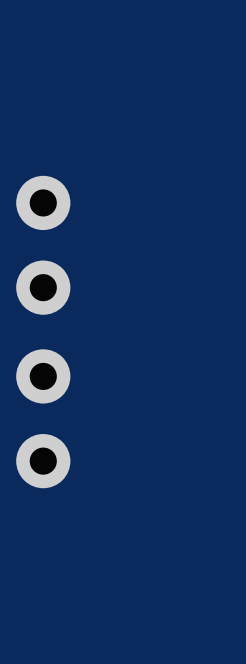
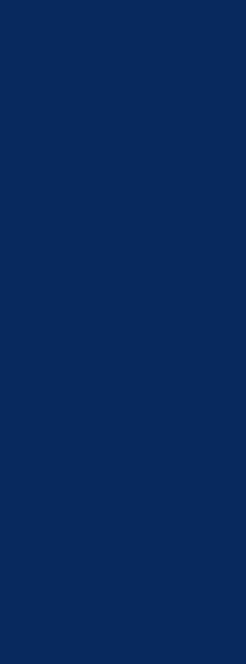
part: (43, 245) -> none
part: (43, 418) -> none

